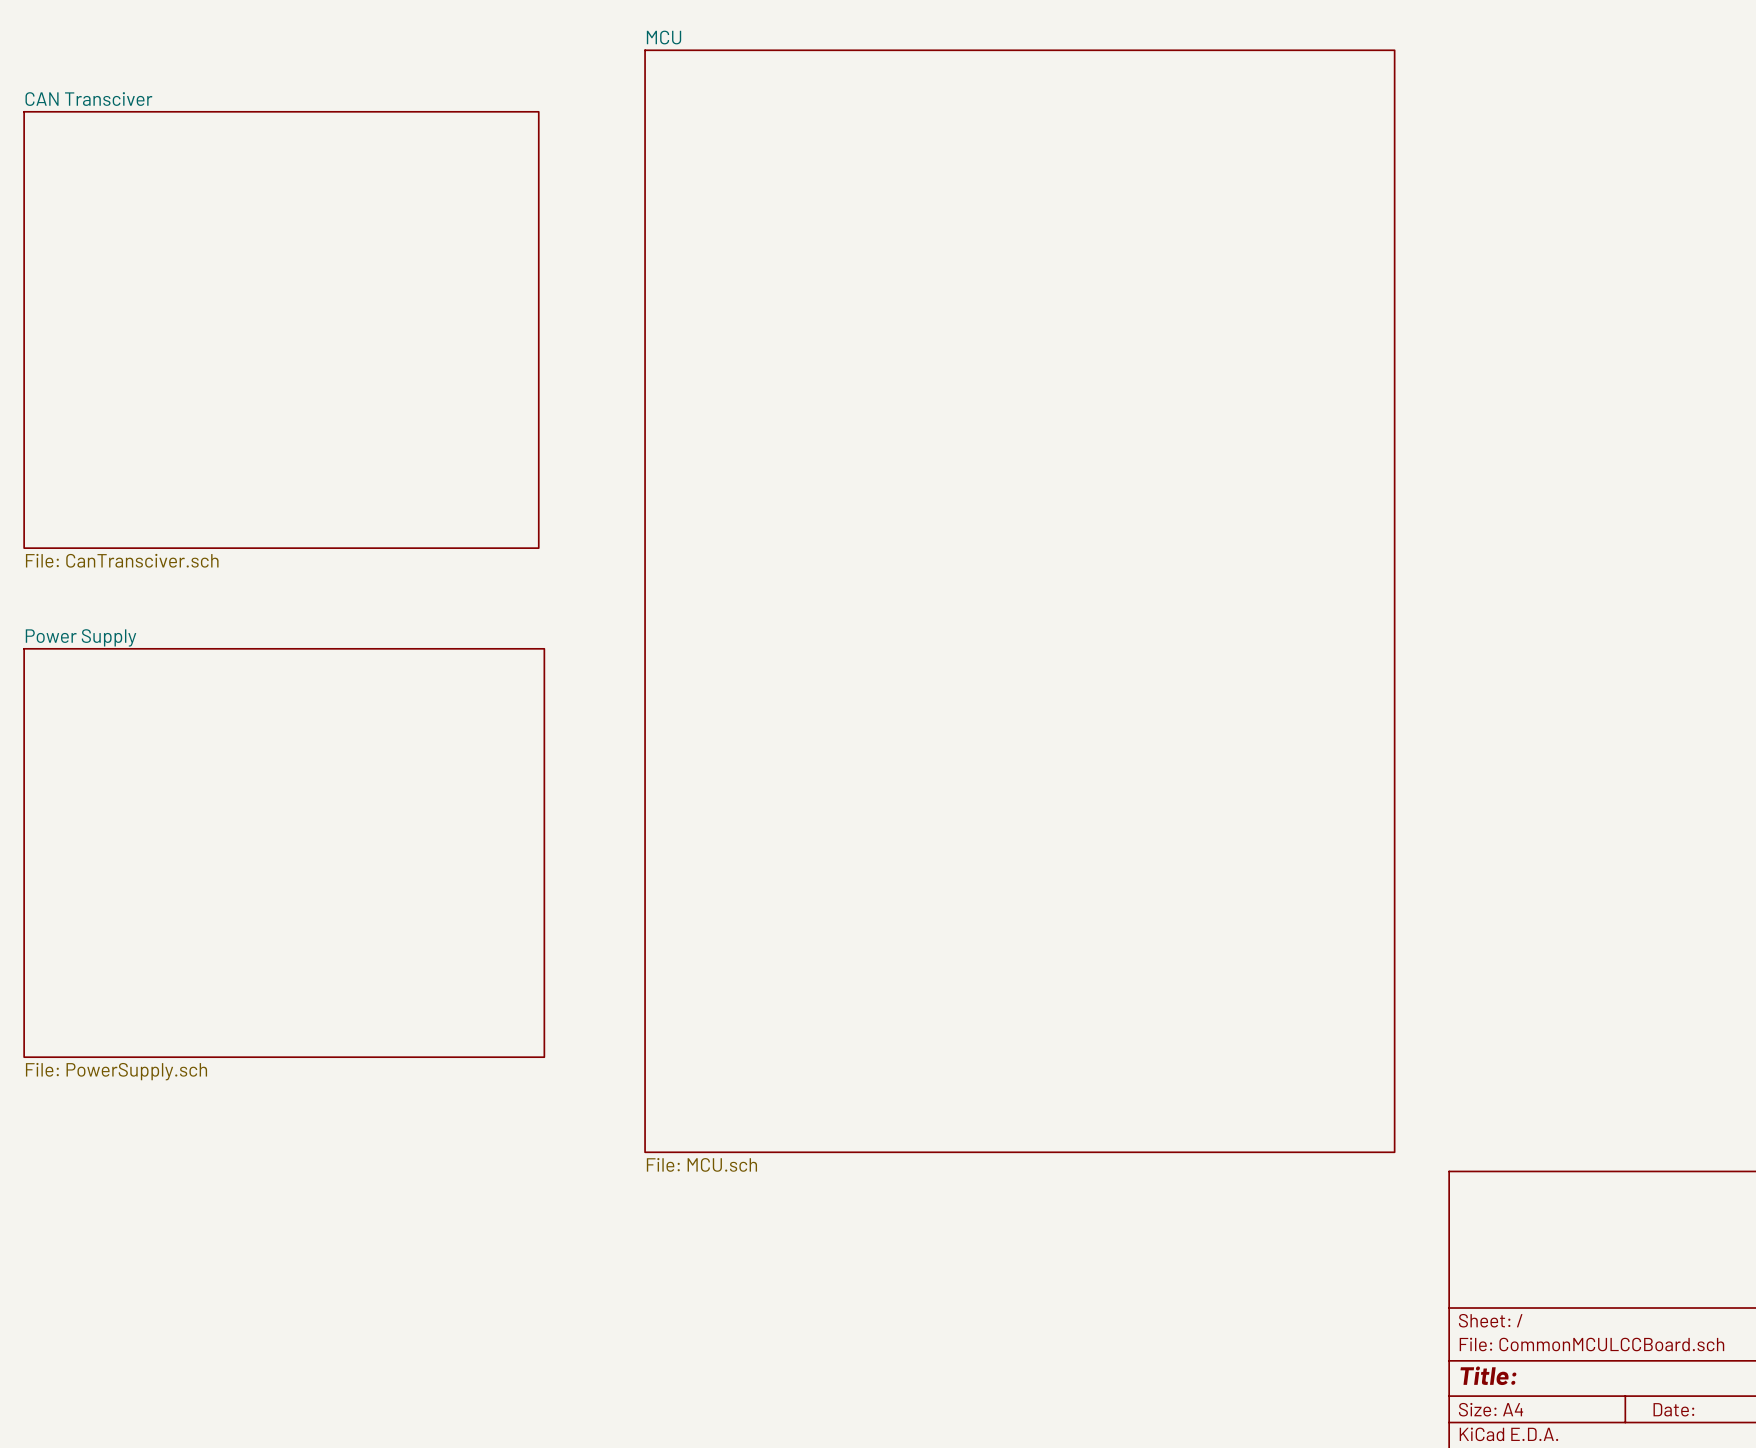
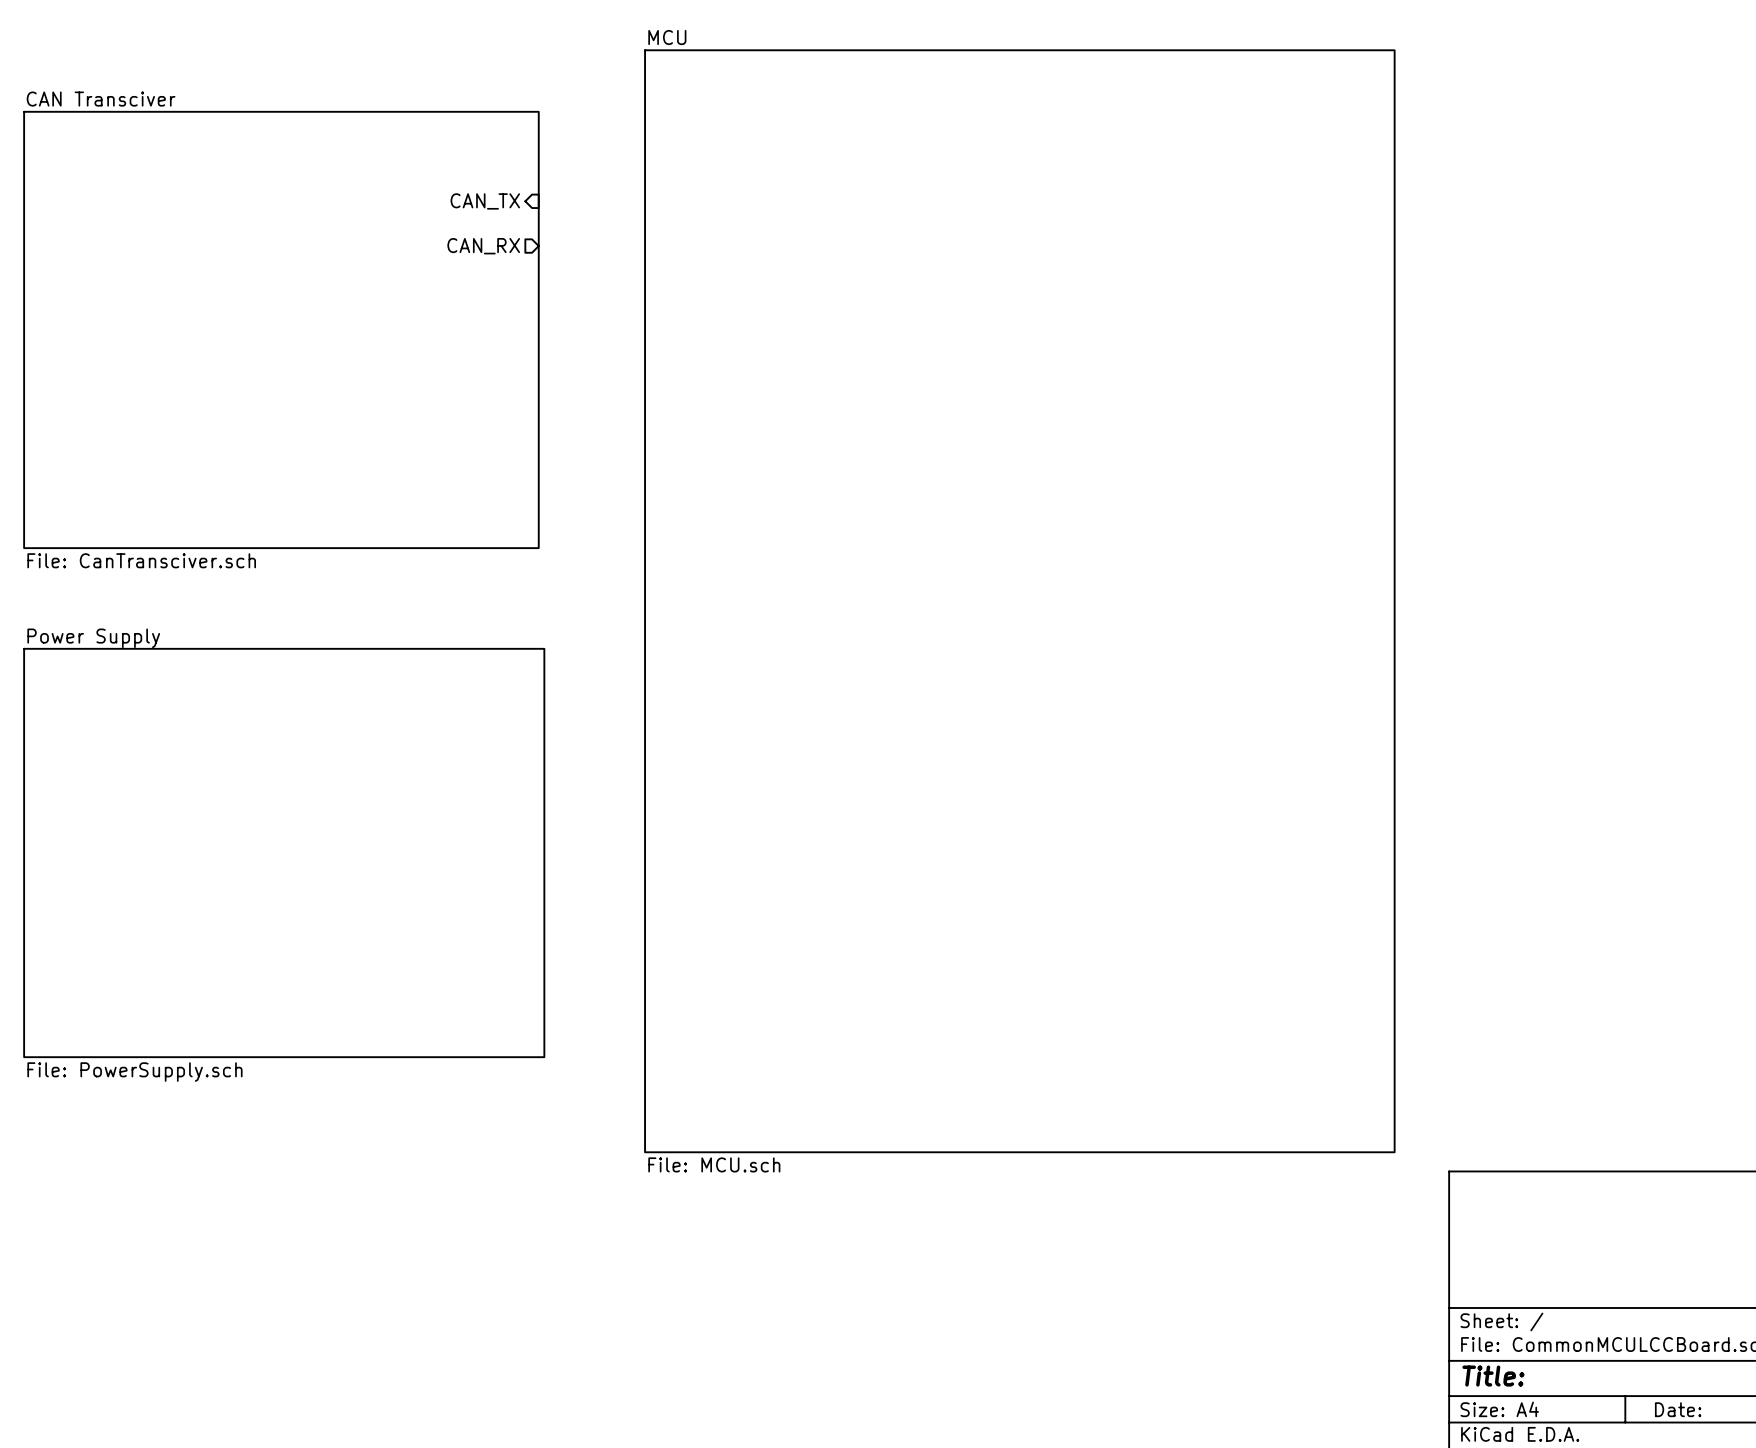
sheet pin: none -> CAN_TX (485, 201)
sheet pin: none -> CAN_RX (483, 246)

